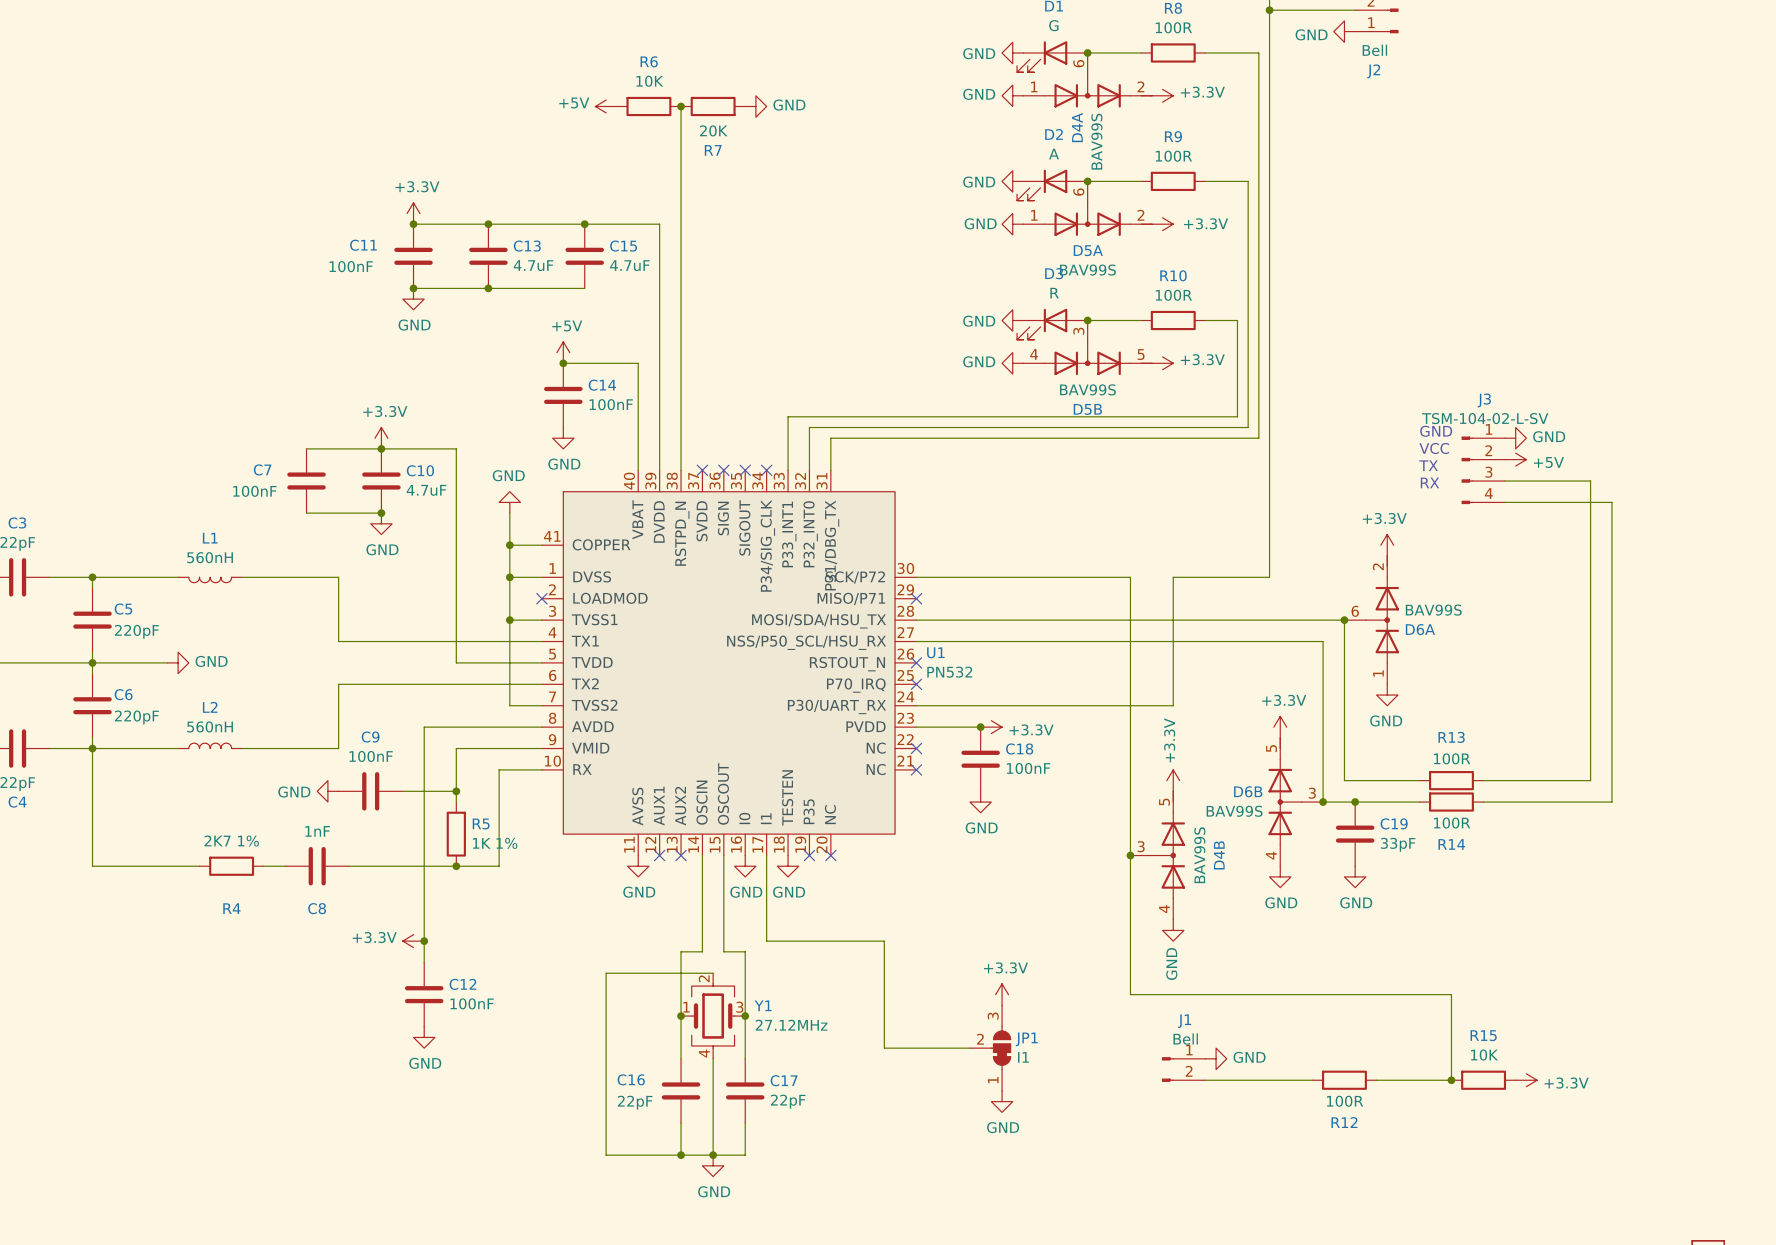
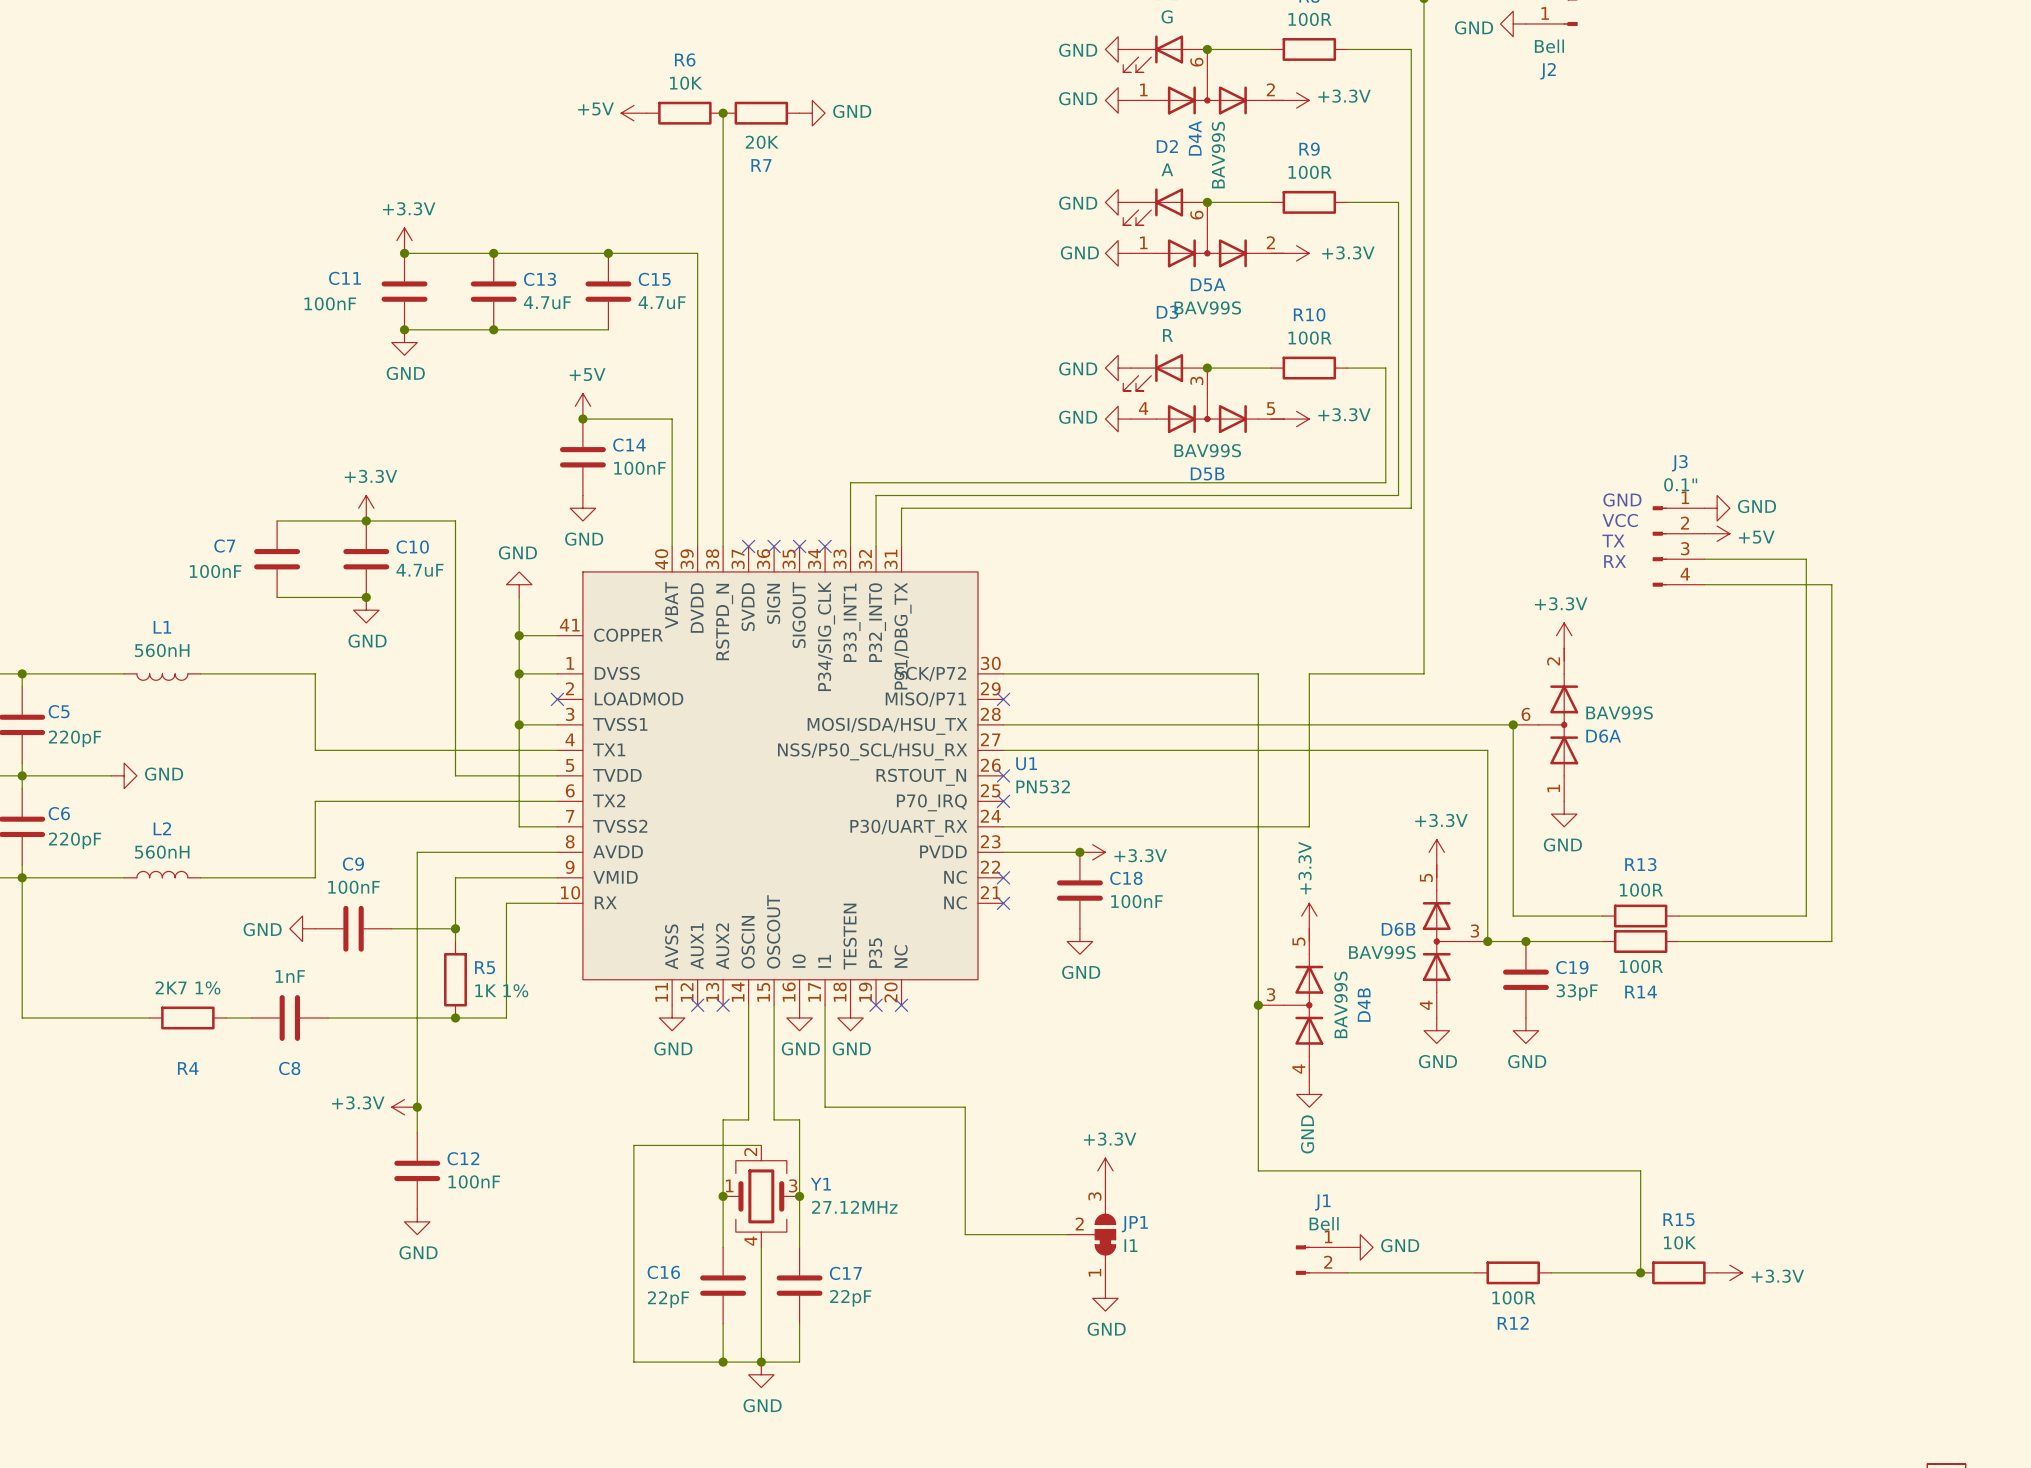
J3 value: TSM-104-02-L-SV (1485, 418) -> 0.1" (1680, 484)

